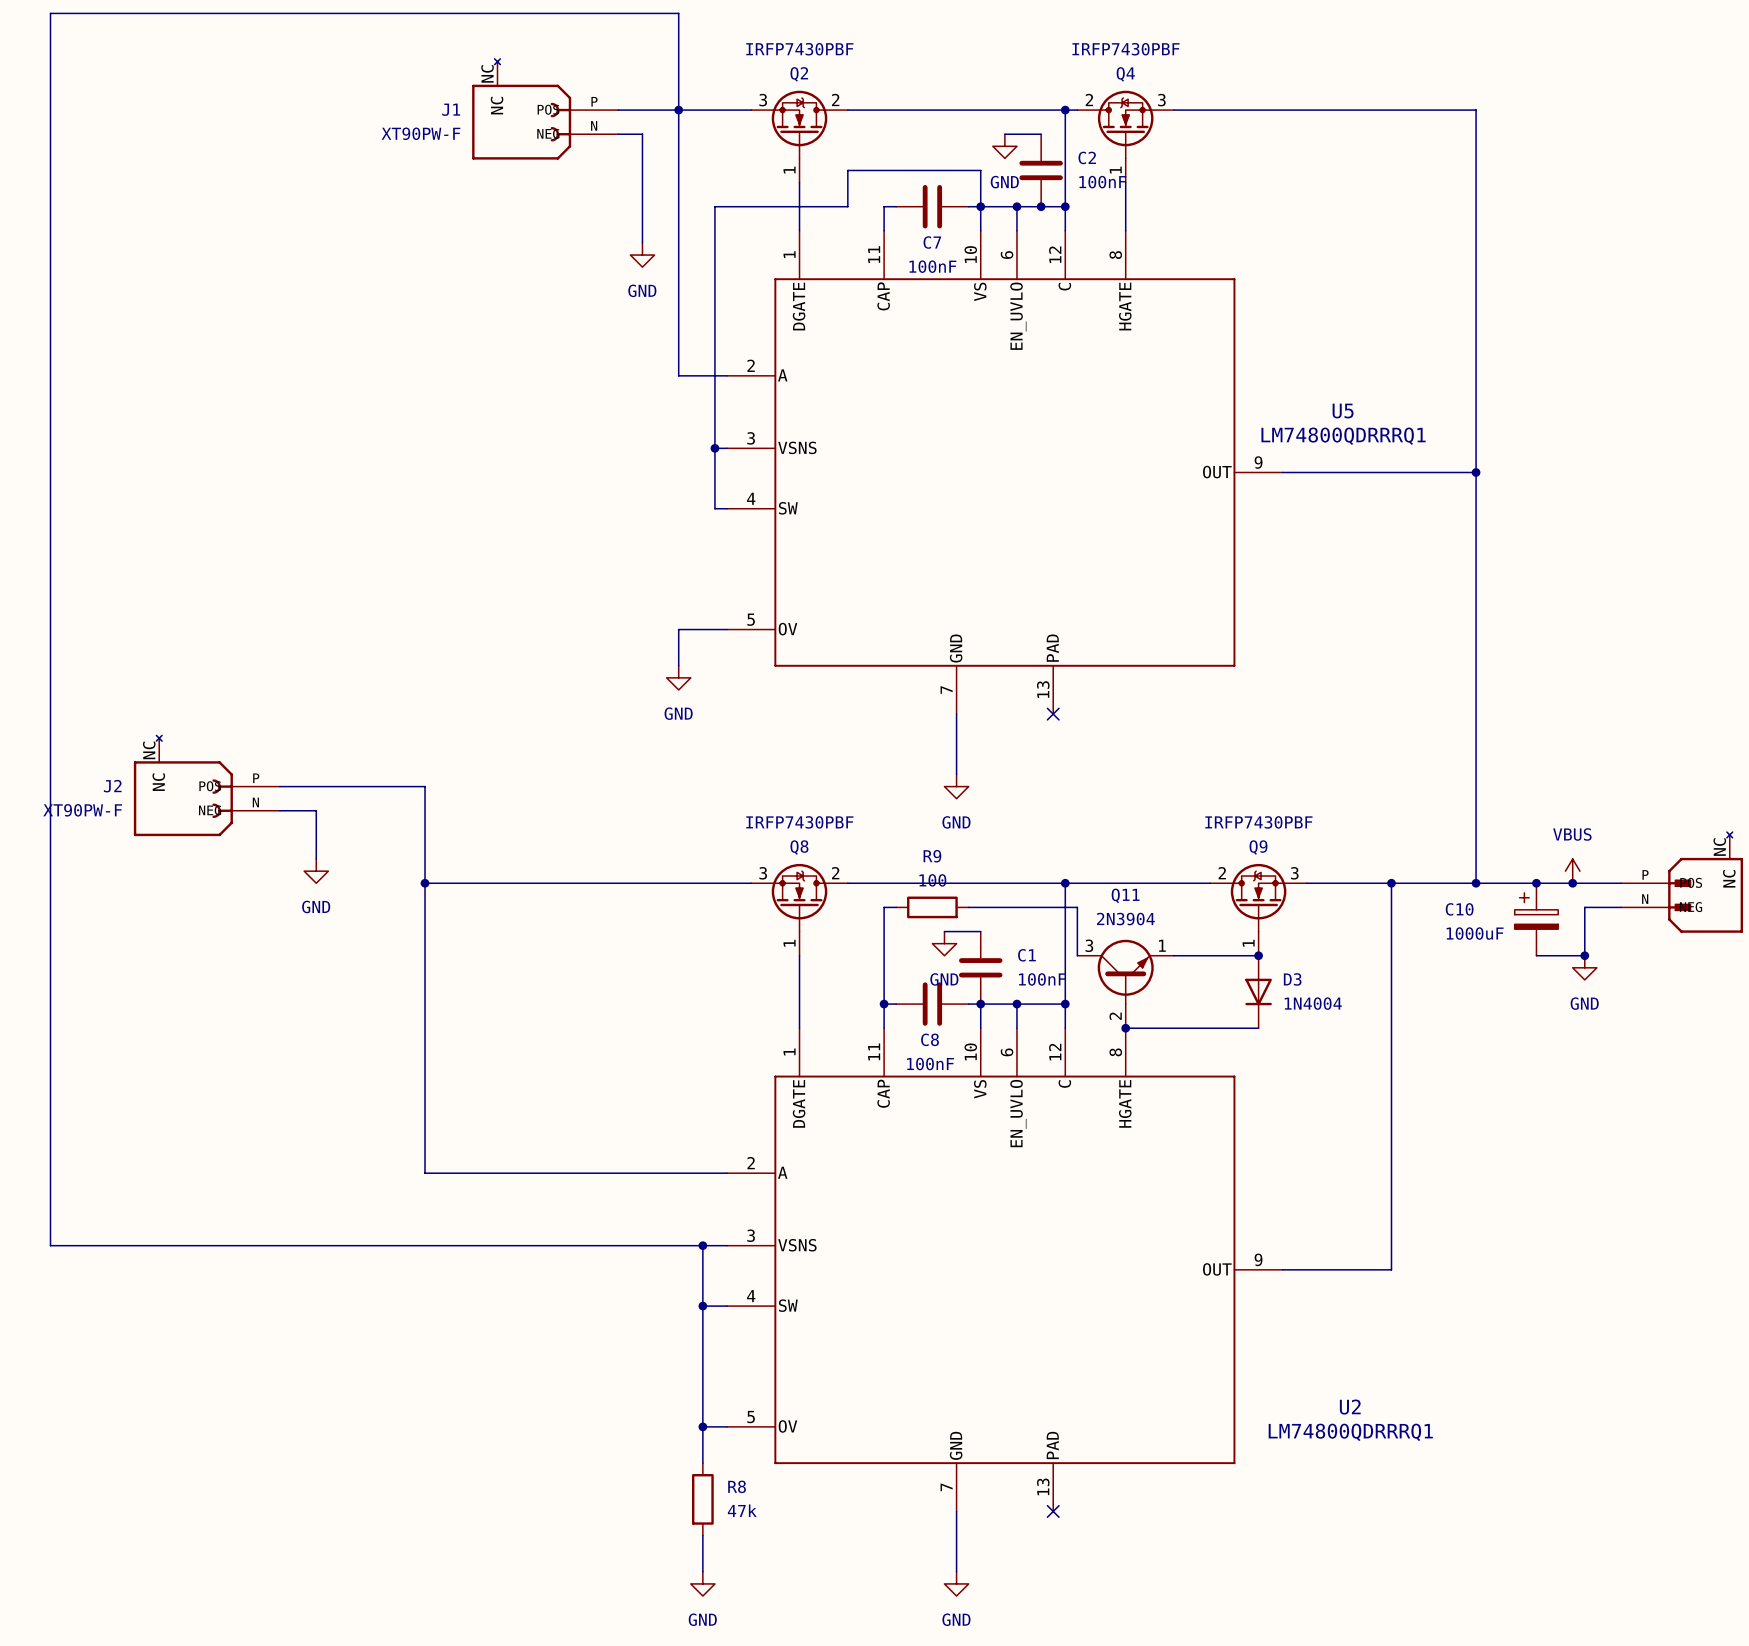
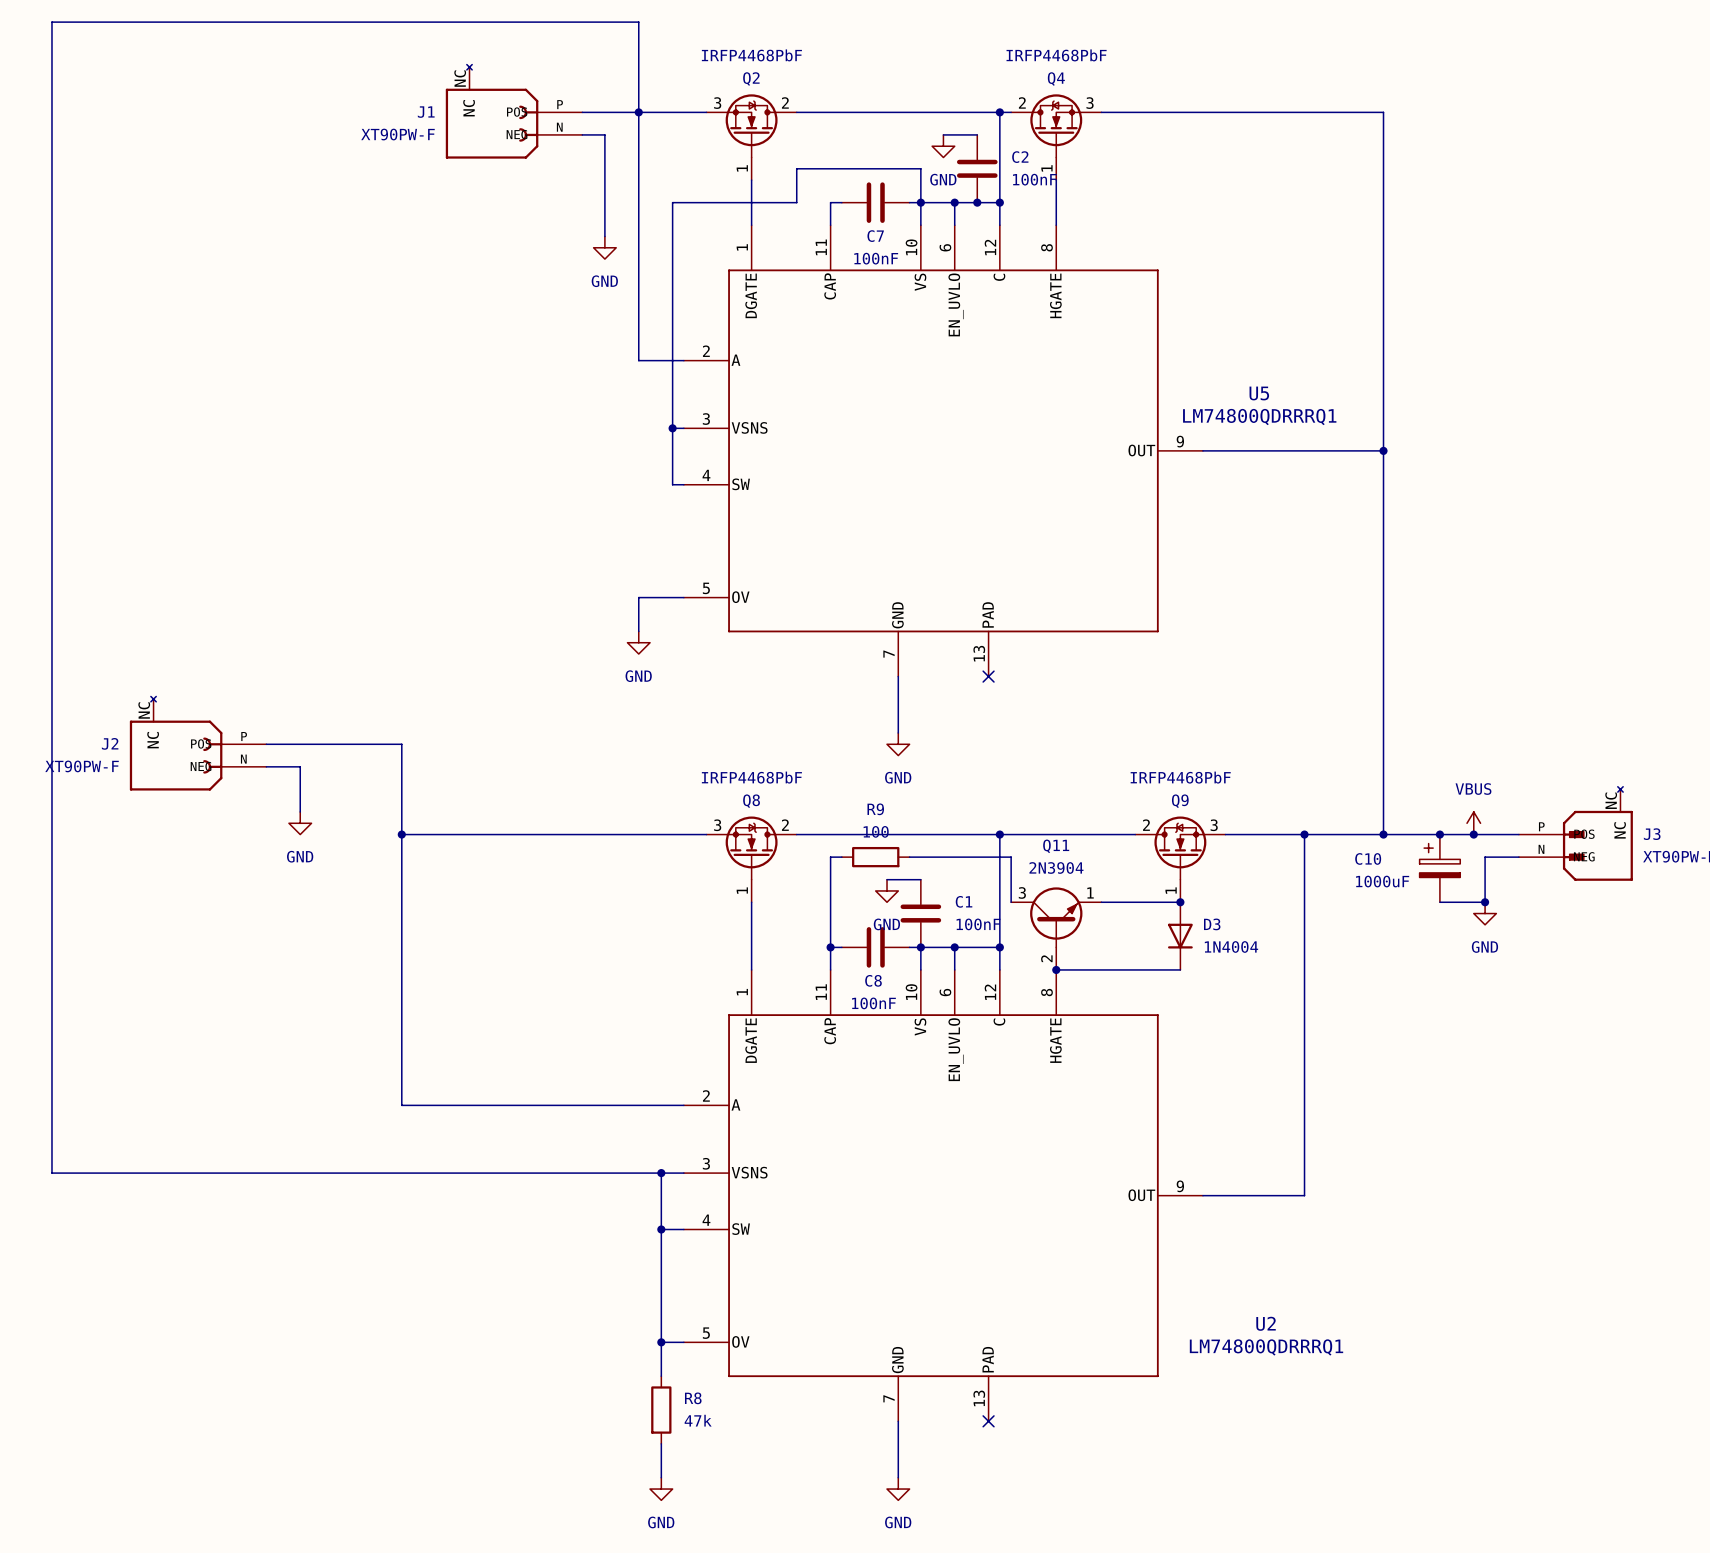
Q2 value: IRFP7430PBF (799, 49) -> IRFP4468PbF (751, 55)
Q4 value: IRFP7430PBF (1126, 49) -> IRFP4468PbF (1056, 55)
Q8 value: IRFP7430PBF (799, 822) -> IRFP4468PbF (751, 777)
Q9 value: IRFP7430PBF (1258, 822) -> IRFP4468PbF (1180, 777)

